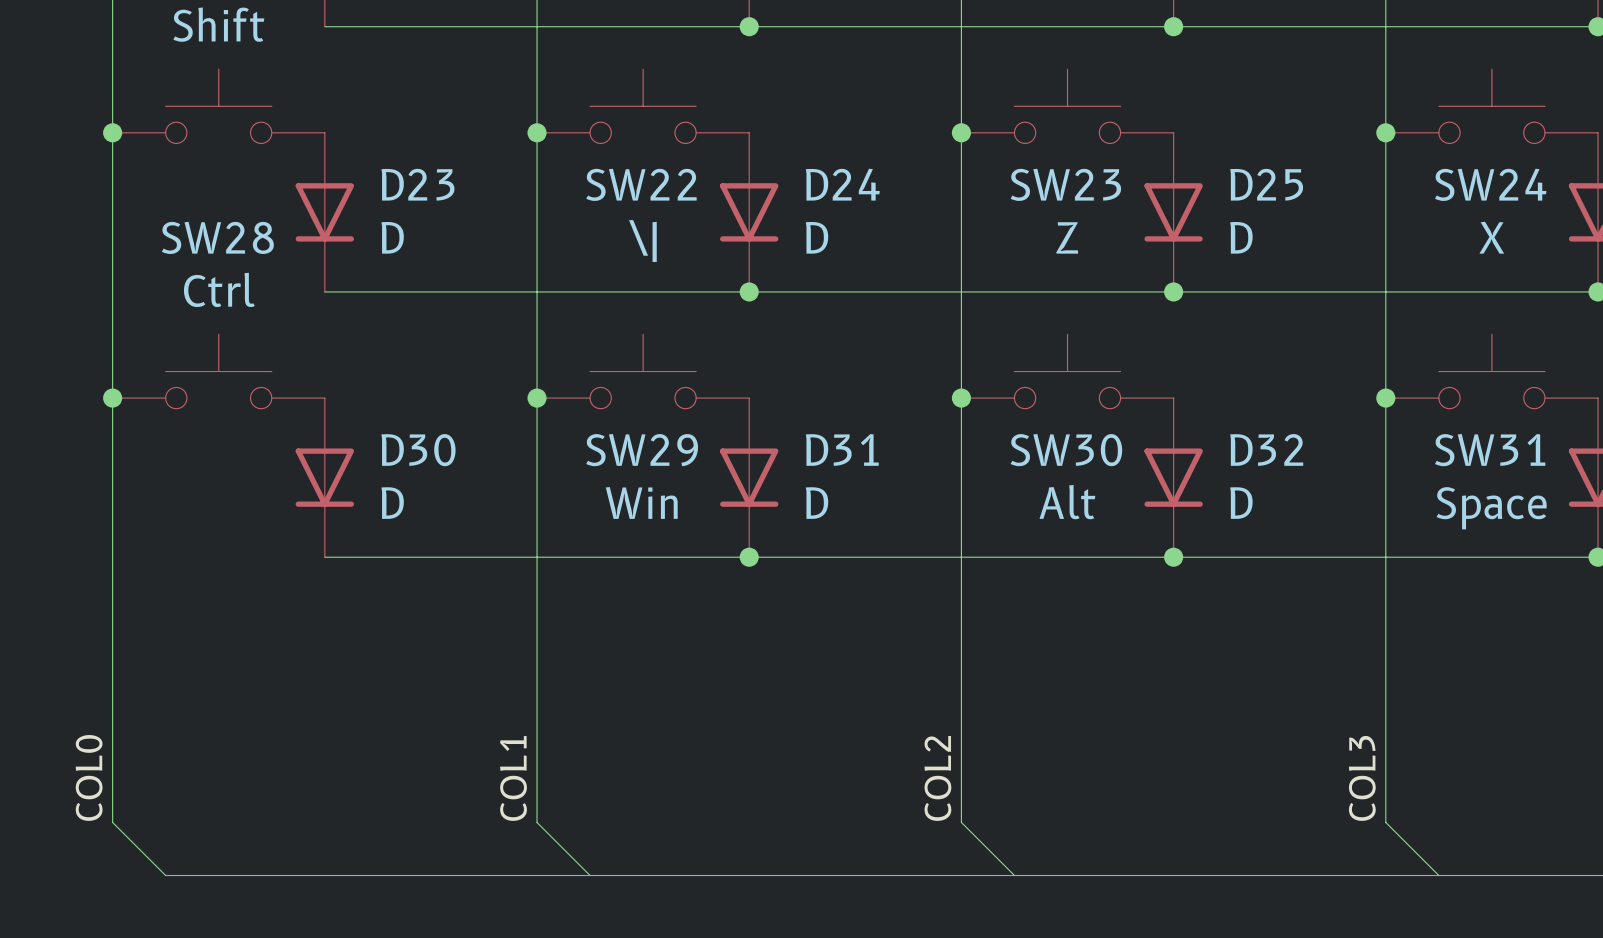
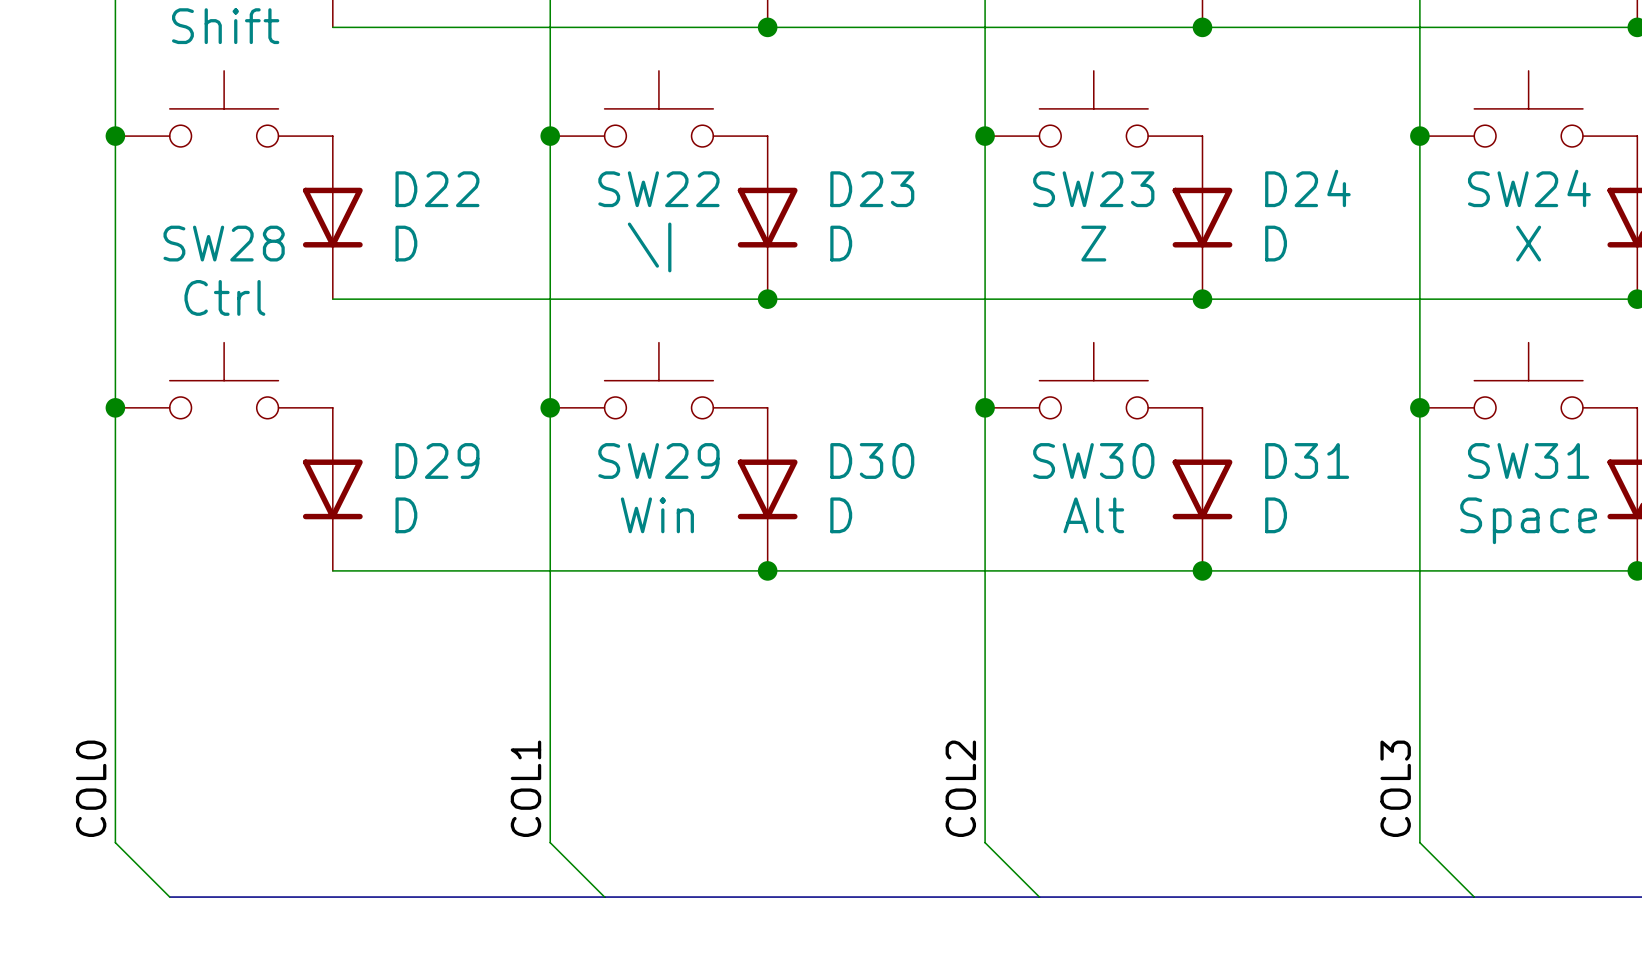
D23 name: D23 (417, 184) -> D22 (437, 189)
D24 name: D24 (842, 184) -> D23 (872, 189)
D25 name: D25 (1266, 184) -> D24 (1307, 188)
D31 name: D31 (842, 449) -> D30 (872, 460)
D32 name: D32 (1266, 449) -> D31 (1307, 460)
D30 name: D30 (418, 450) -> D29 (437, 460)

